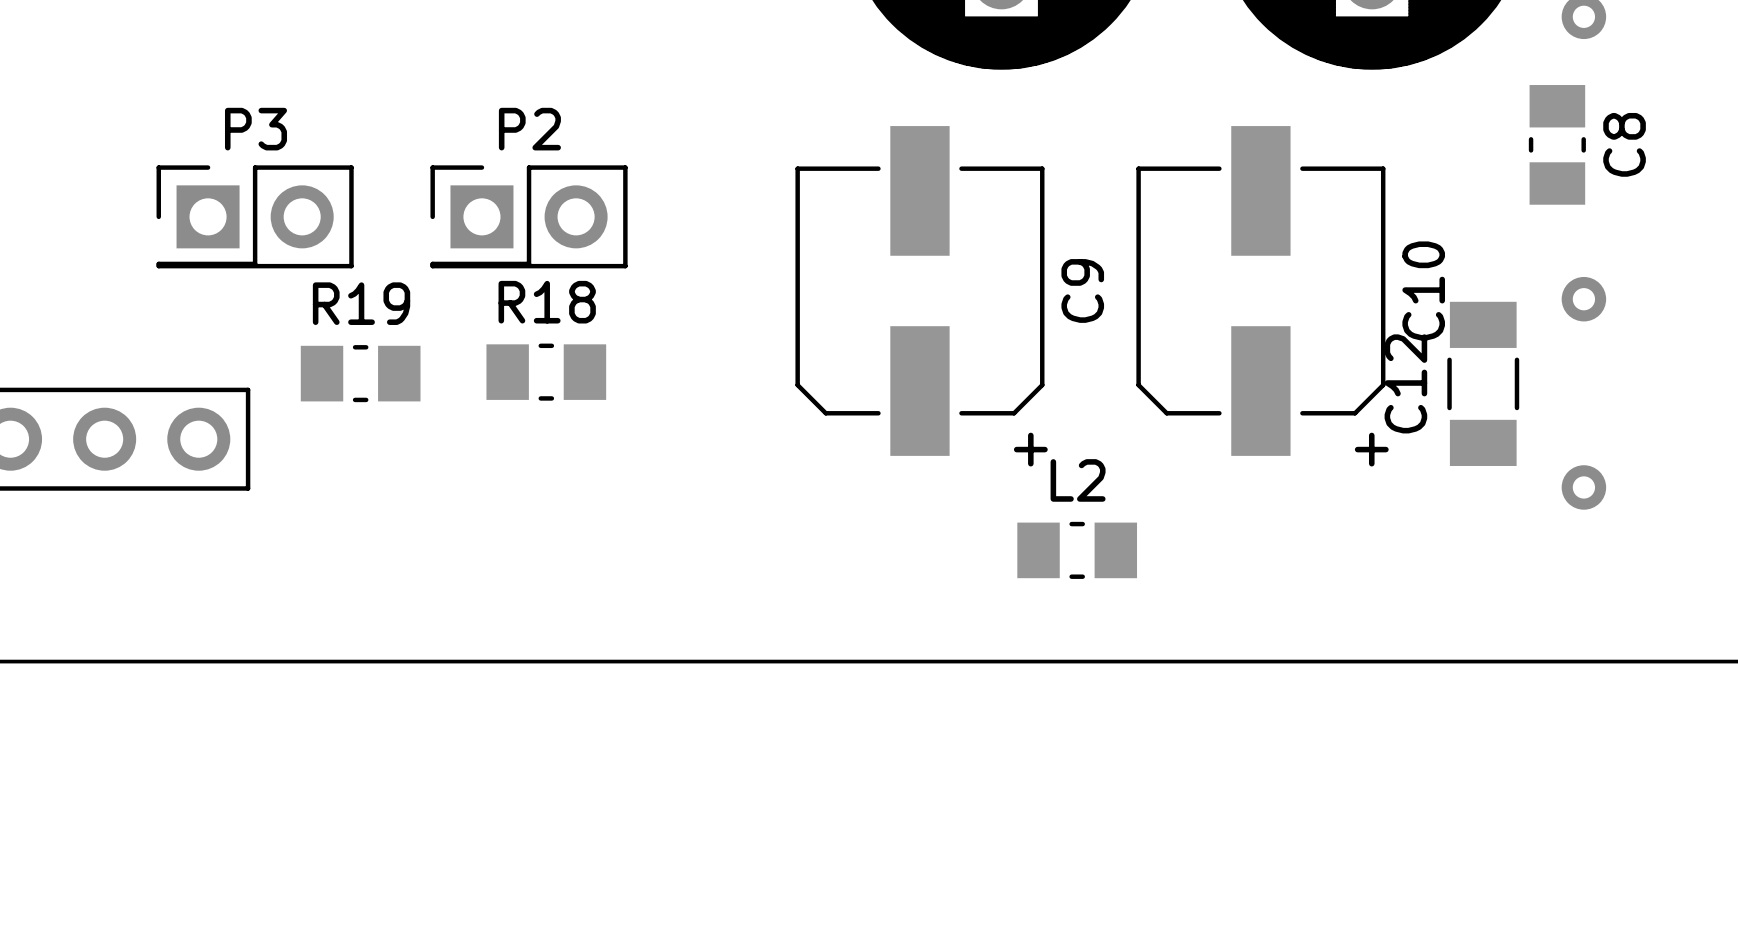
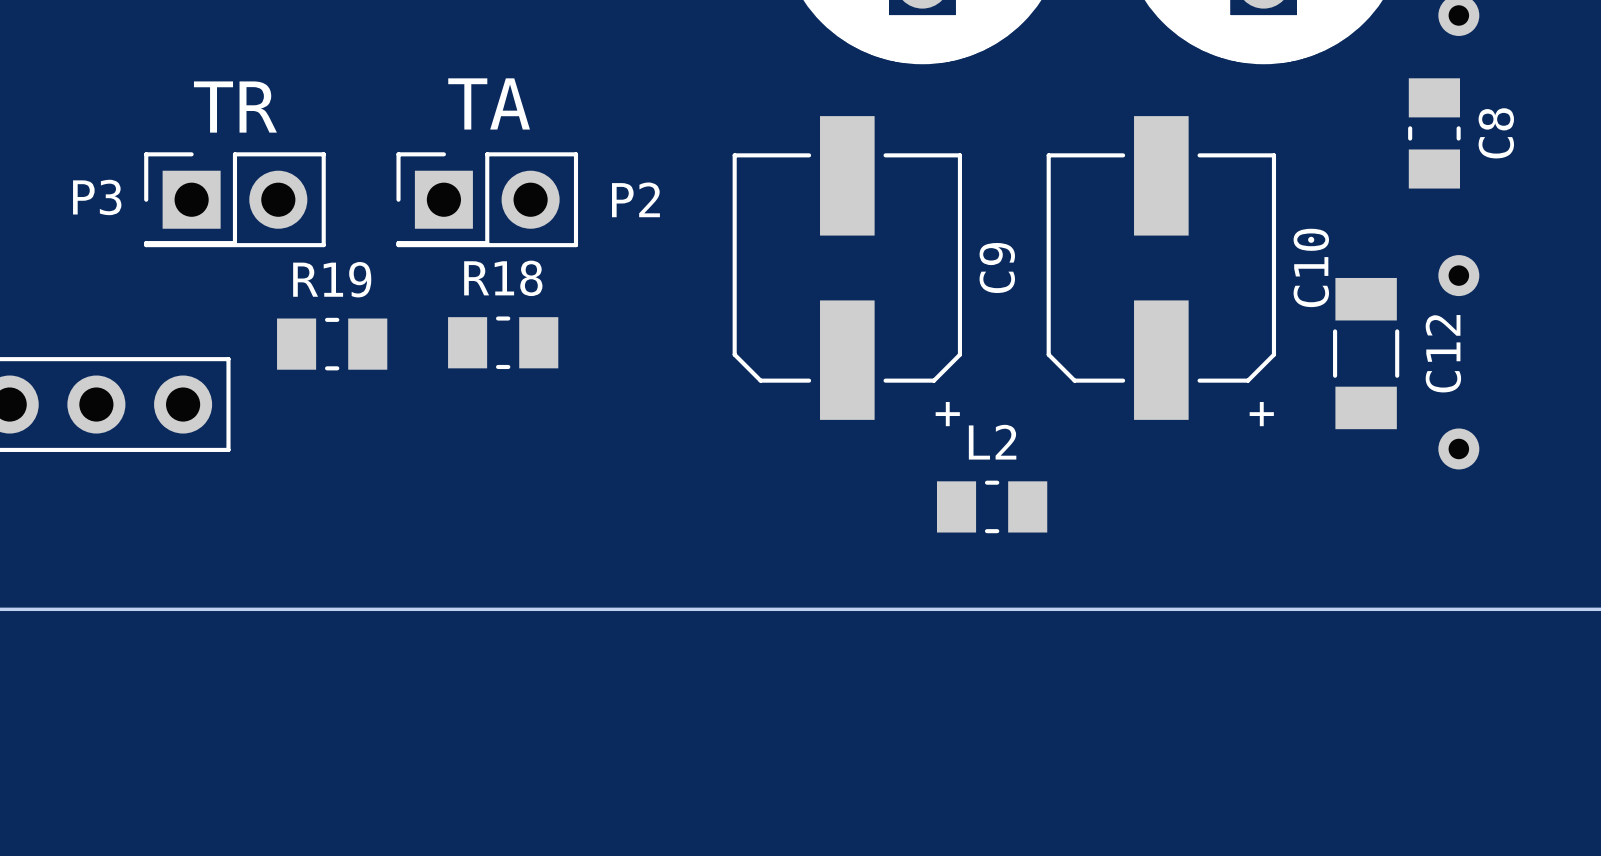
text: none -> TA (489, 103)
text: none -> TR (235, 107)
P3 name position: P3 (256, 129) -> P3 (97, 197)
P2 name position: P2 (529, 129) -> P2 (635, 199)
C12 name position: C12 (1405, 383) -> C12 (1443, 353)

